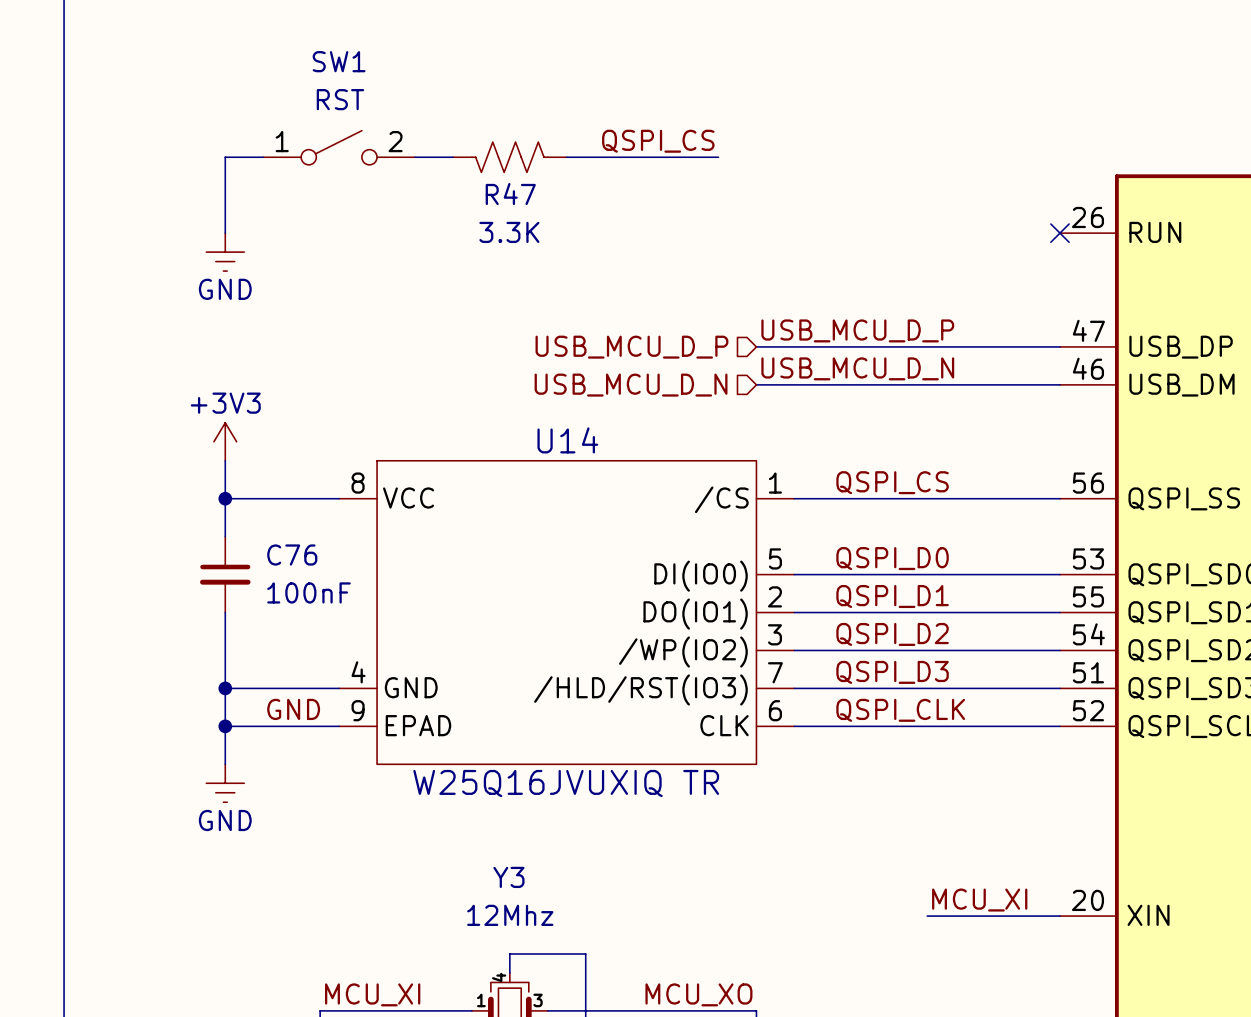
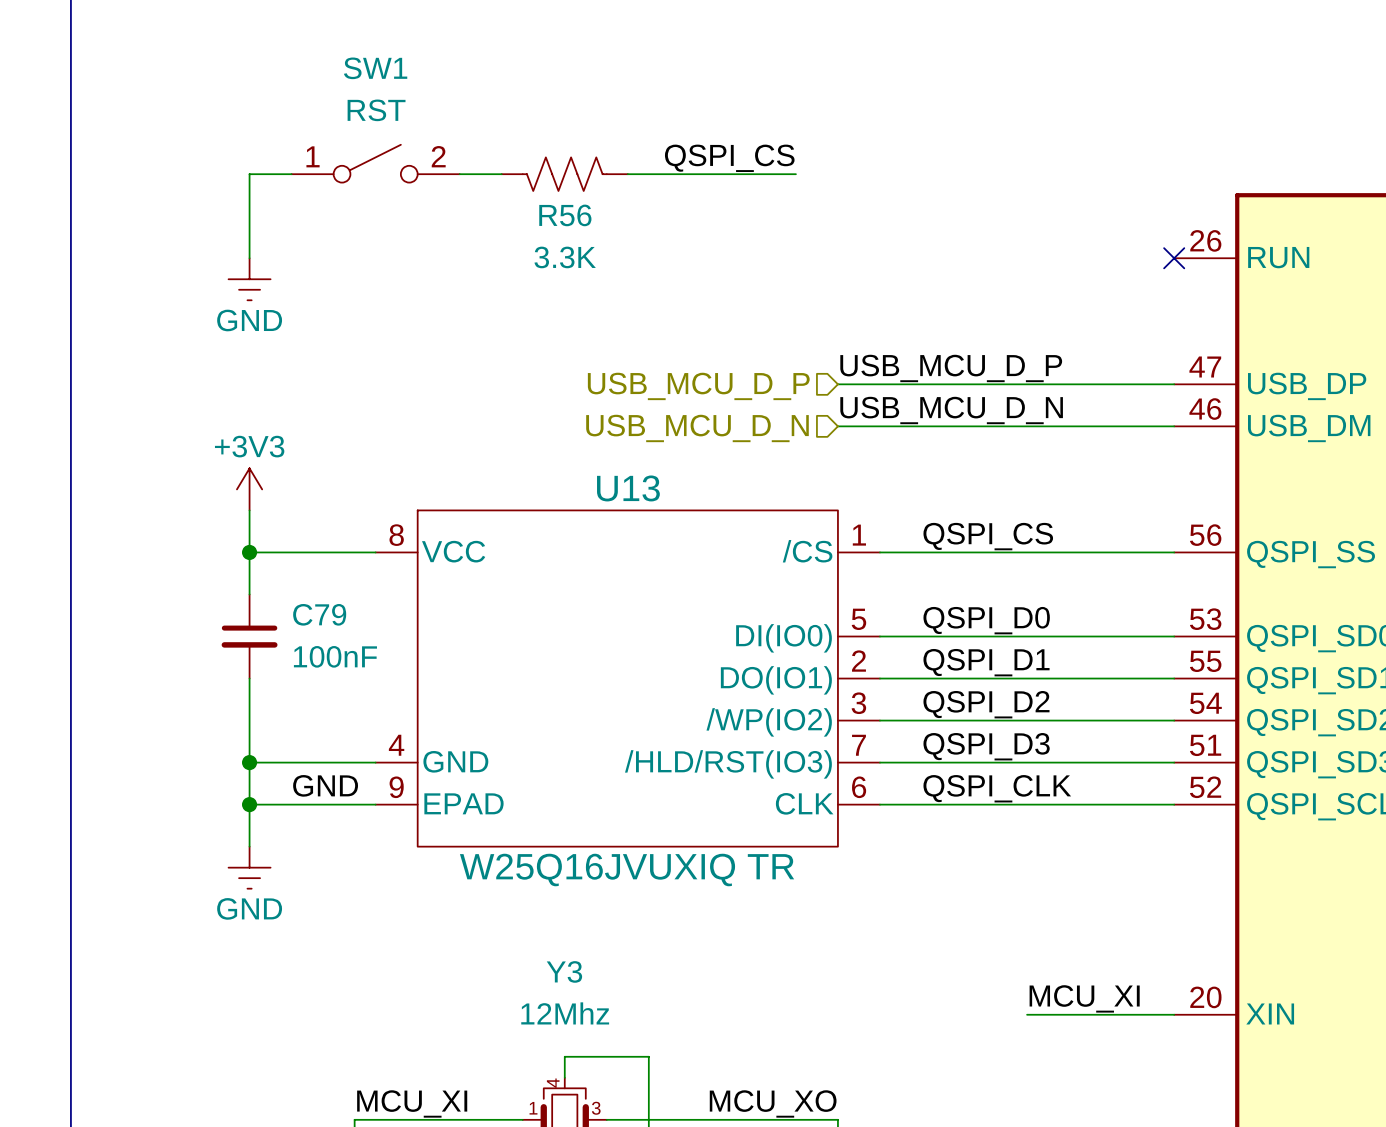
R47 name: R47 (510, 194) -> R56 (565, 215)
U14 name: U14 (567, 440) -> U13 (628, 488)
C76 name: C76 (292, 555) -> C79 (319, 614)

